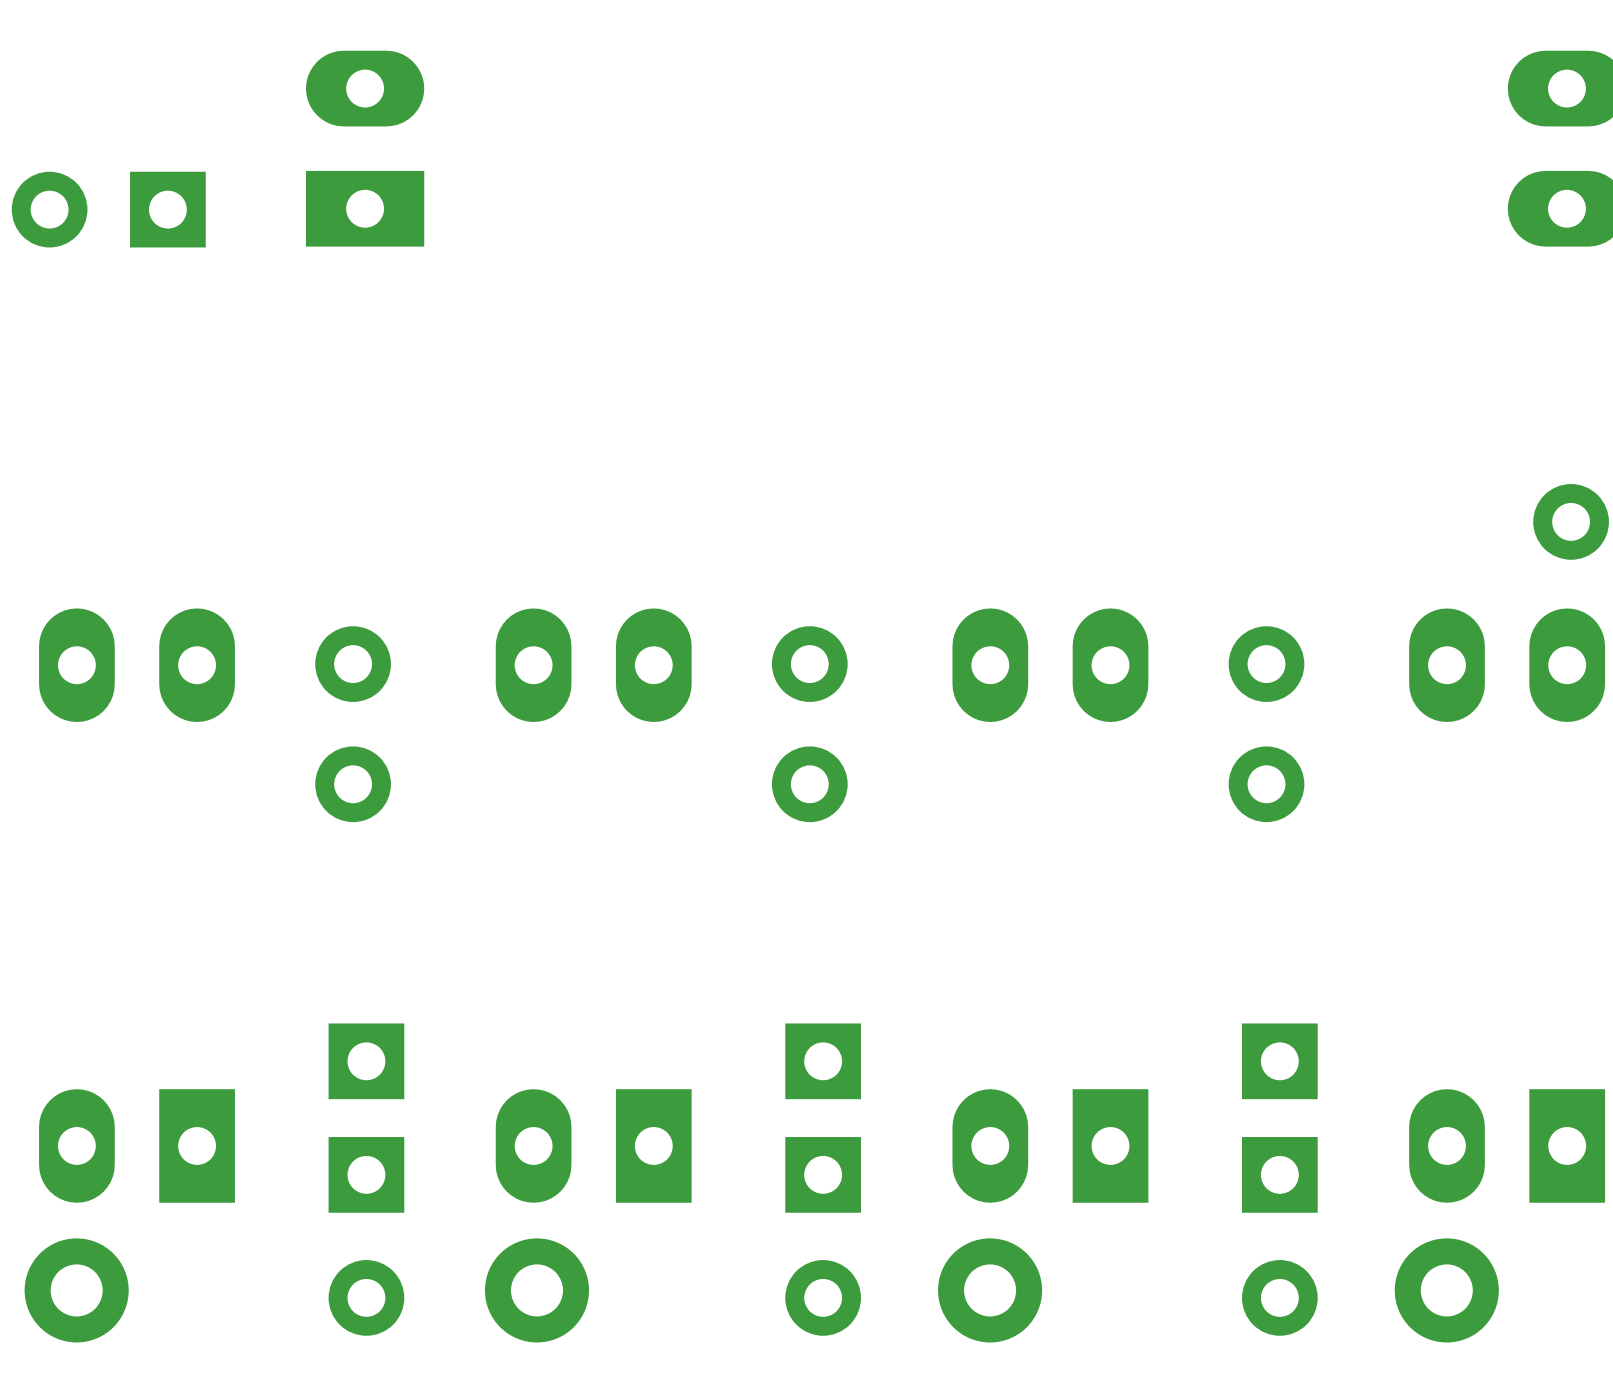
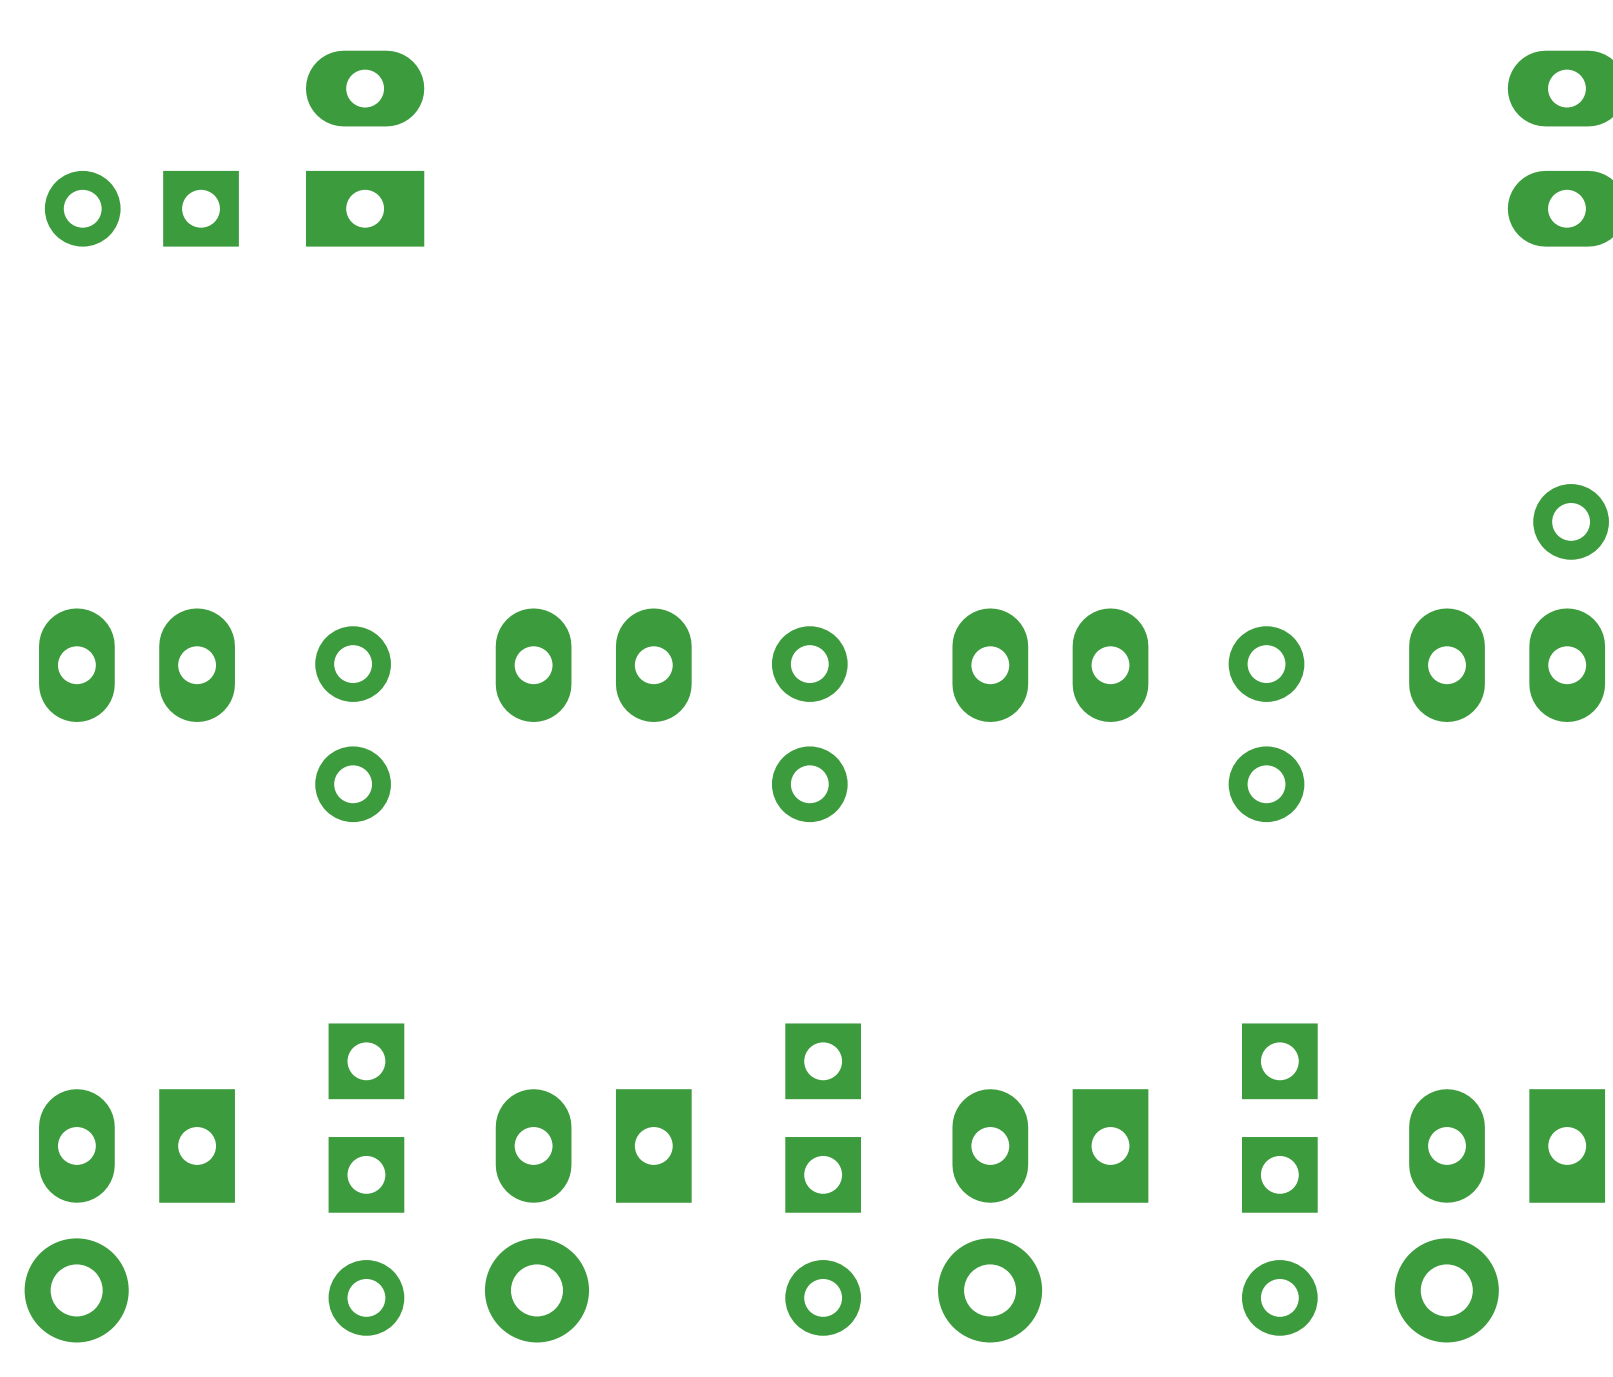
part position: (108, 209) -> (141, 208)

